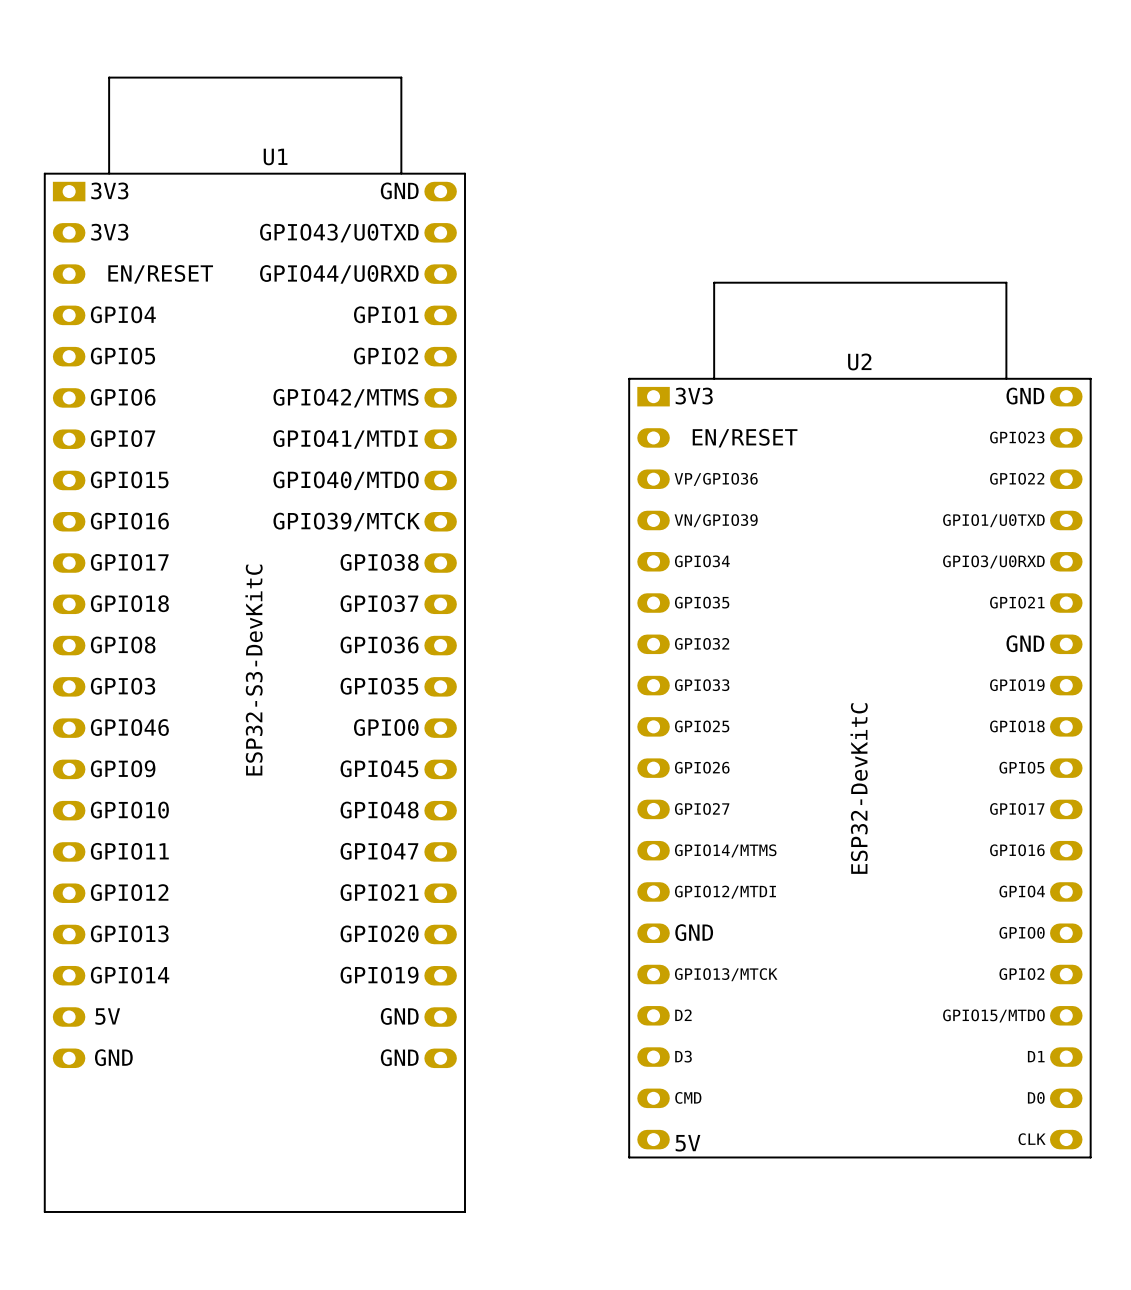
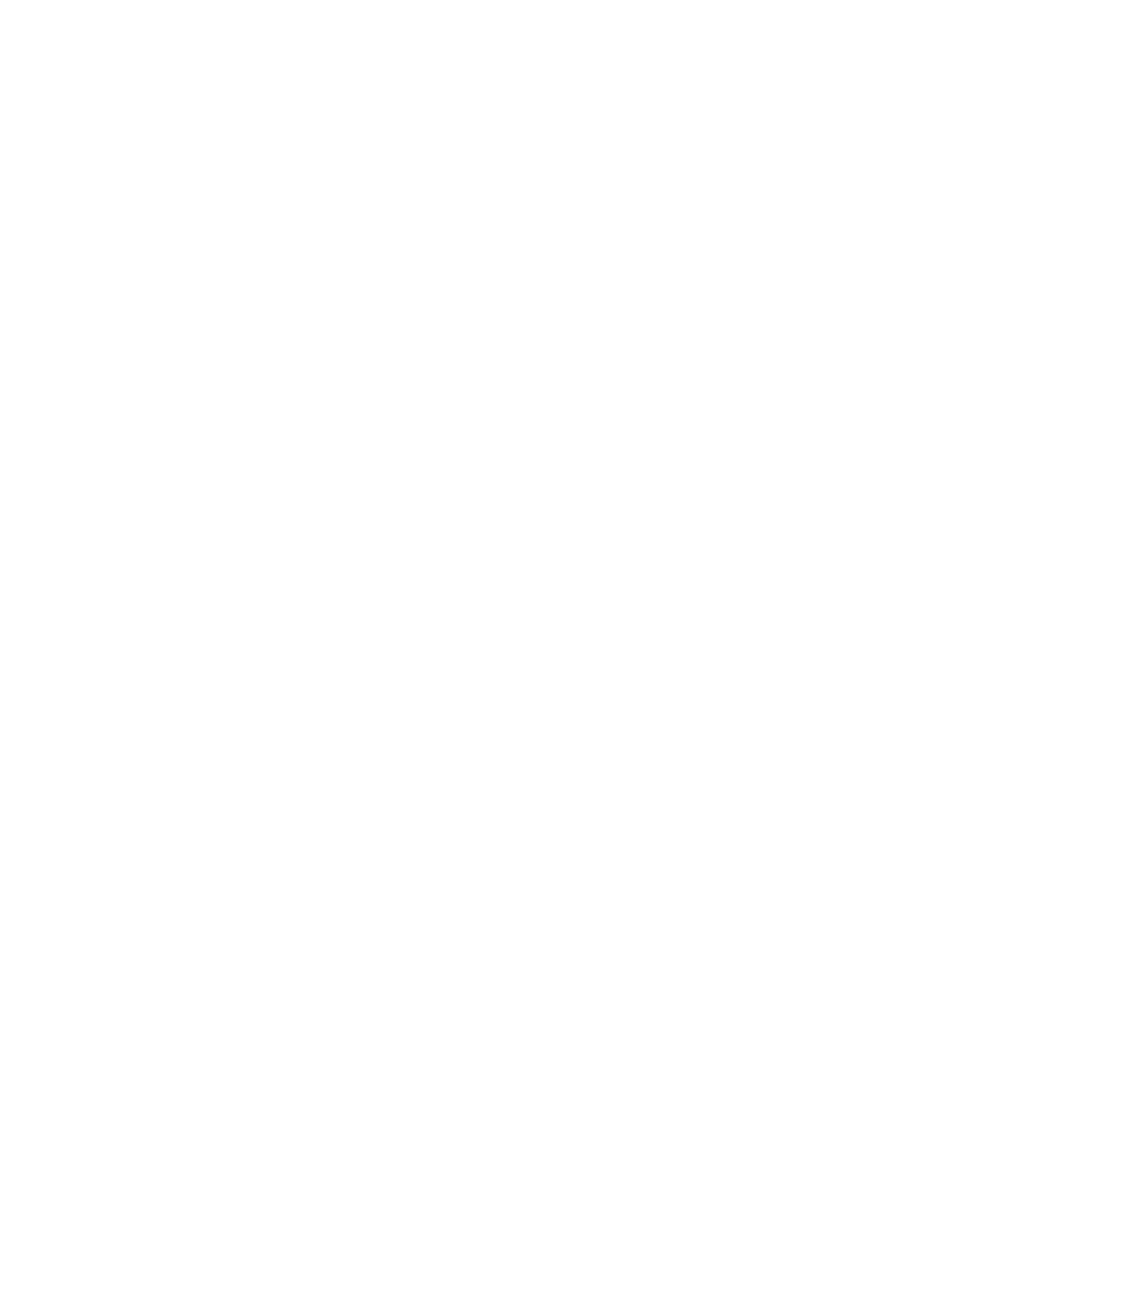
U1: ESP32-S3-DevKitC (254, 644) -> none
U2: ESP32-DevKitC (859, 720) -> none

